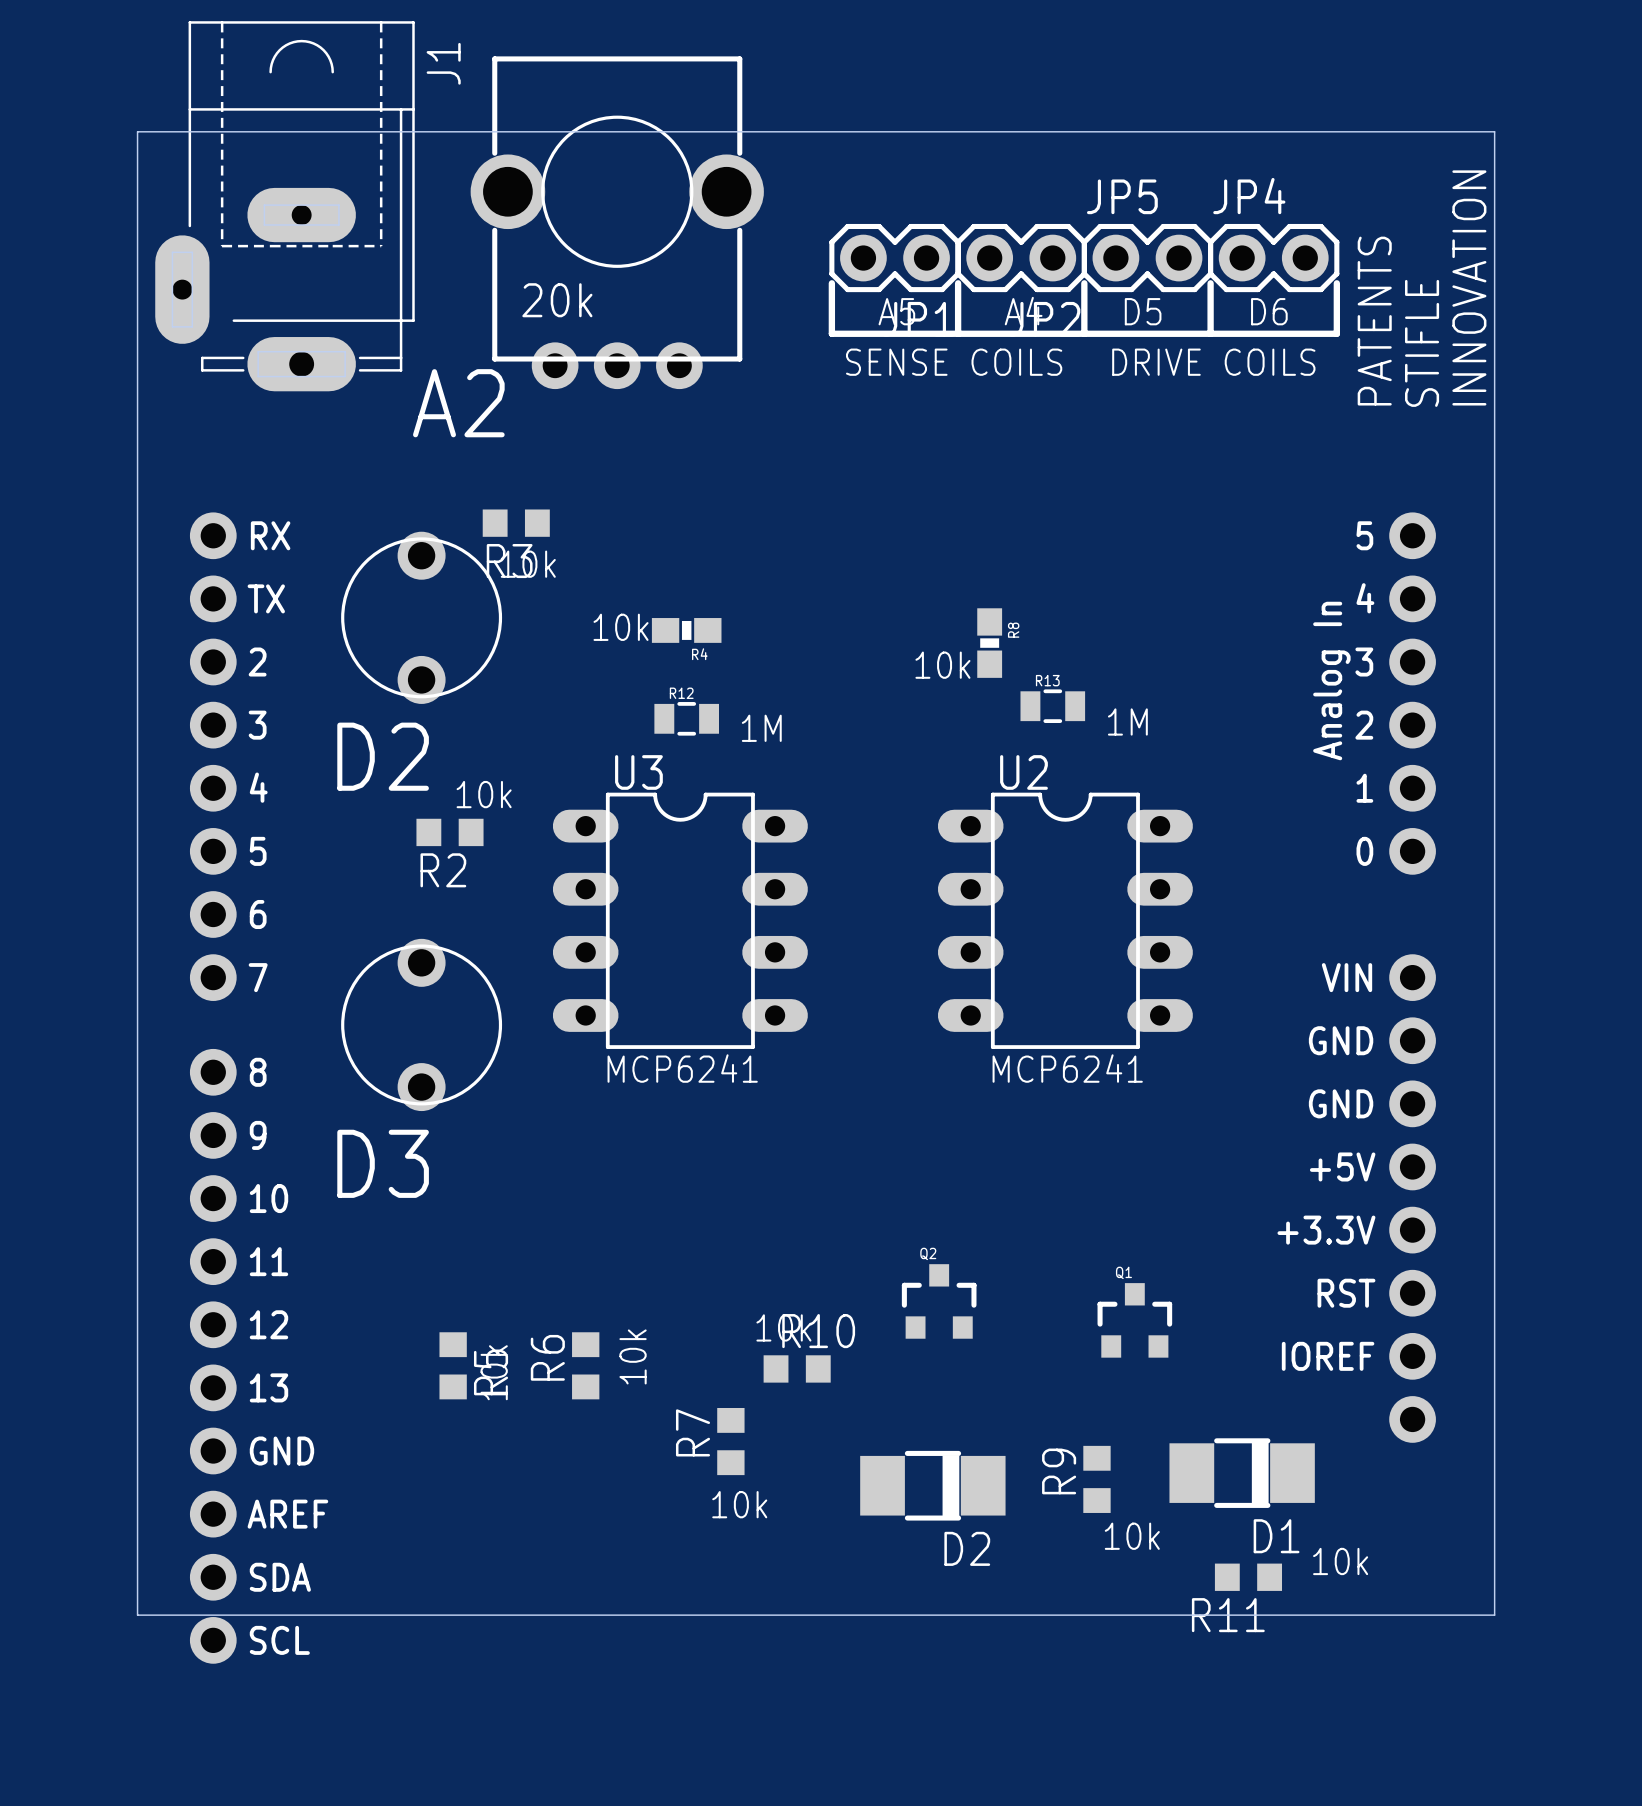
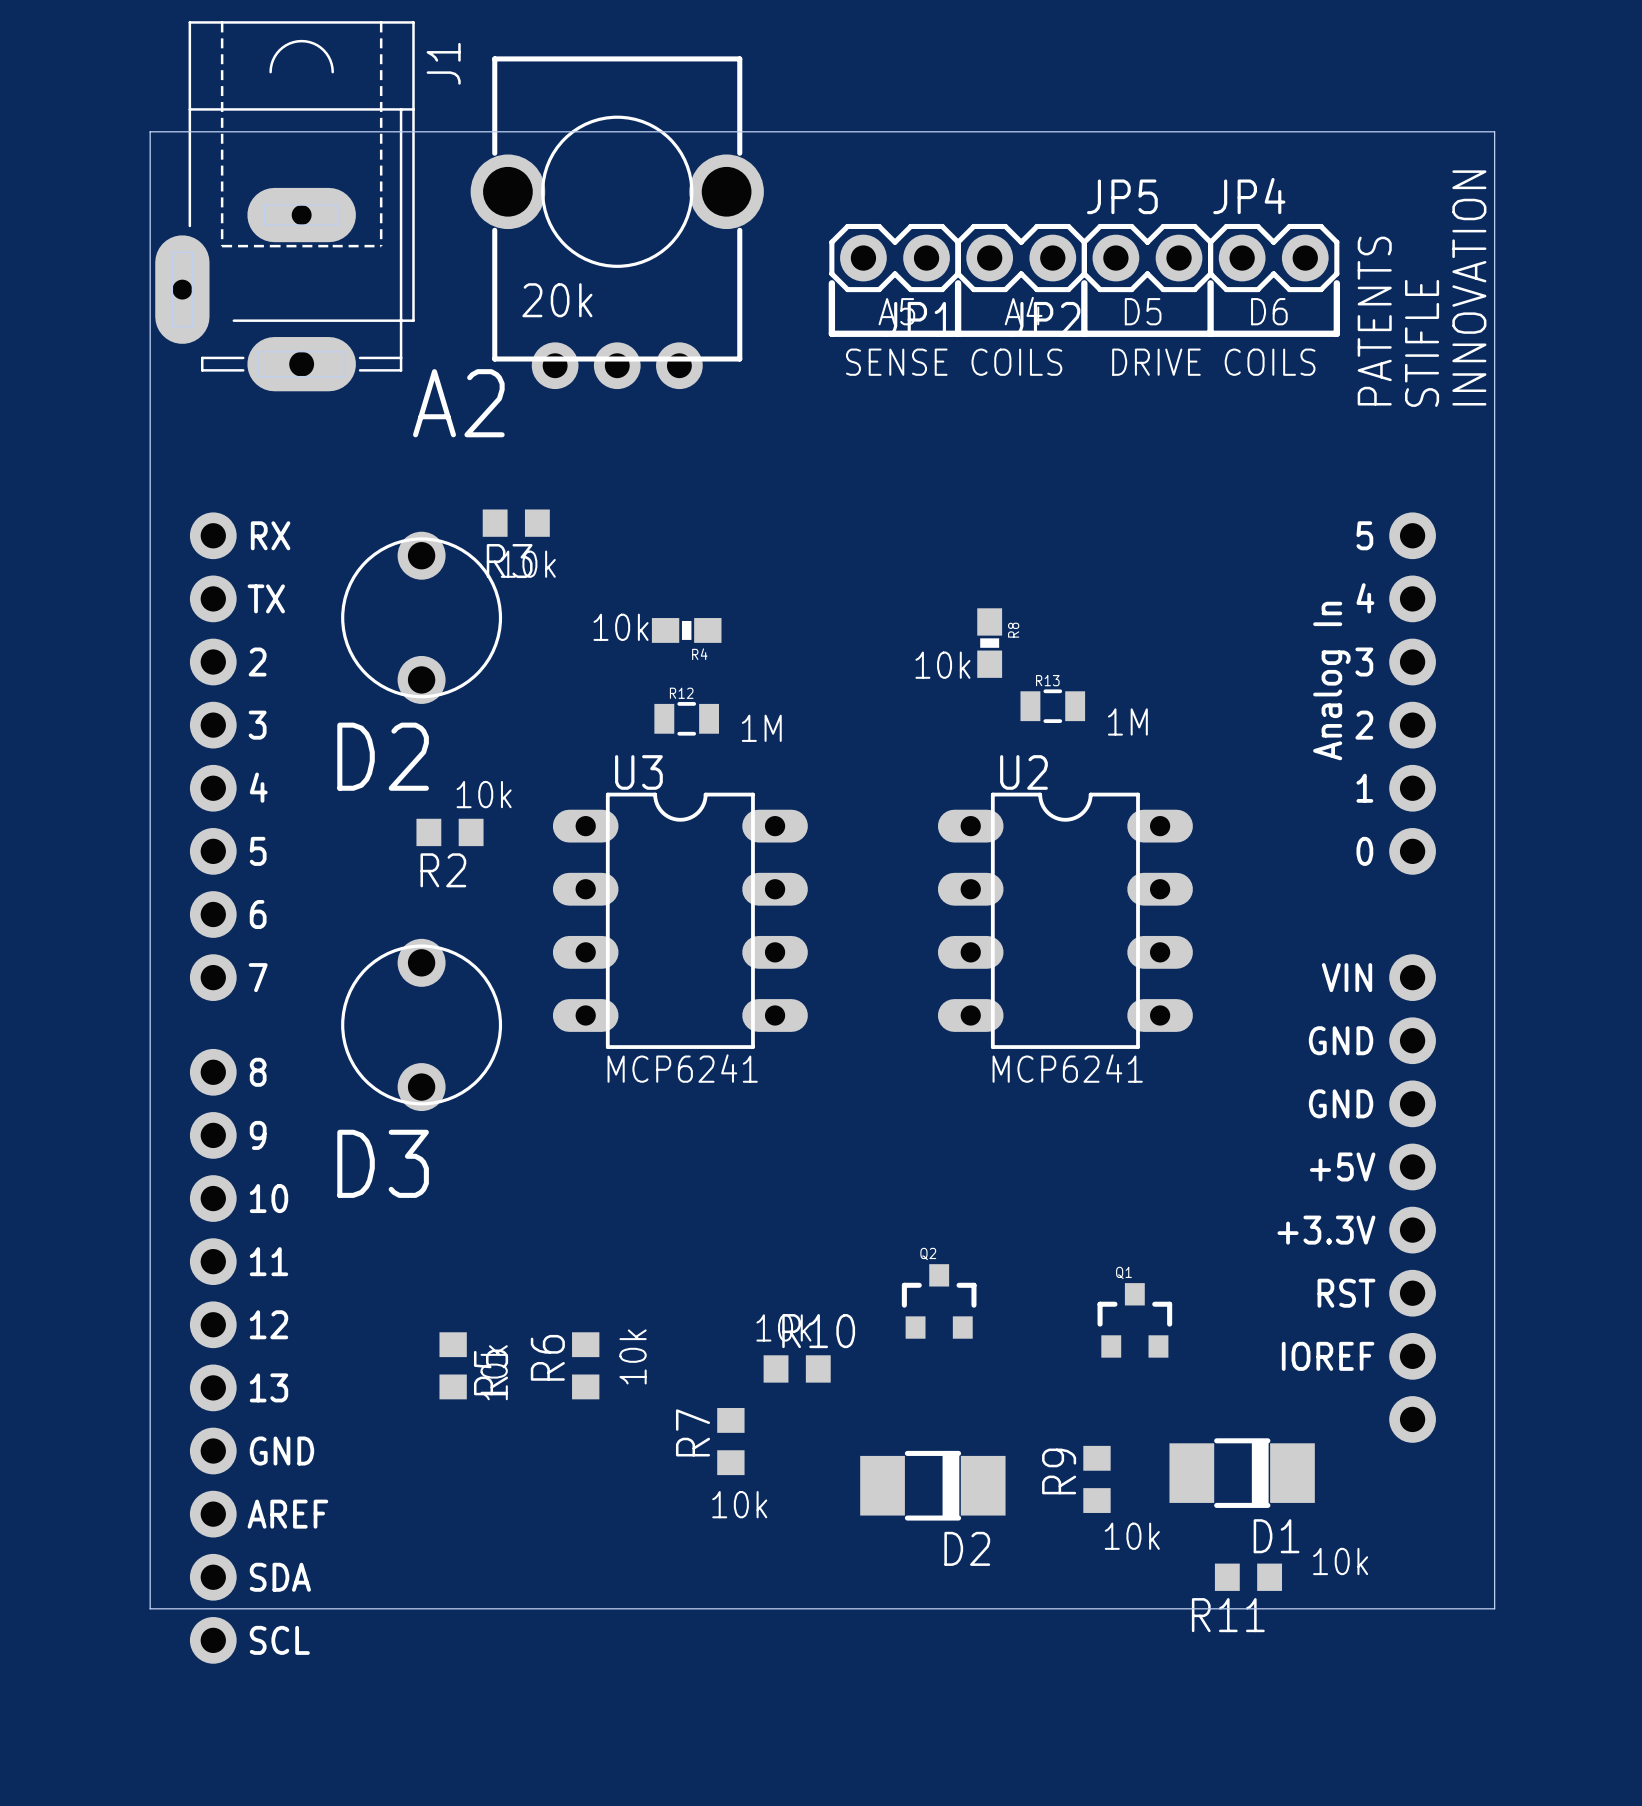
board edge: (150, 131) (137, 131) (137, 1615) (1494, 1615) (1494, 1608) -> (150, 131) (150, 1608) (1494, 1608)

